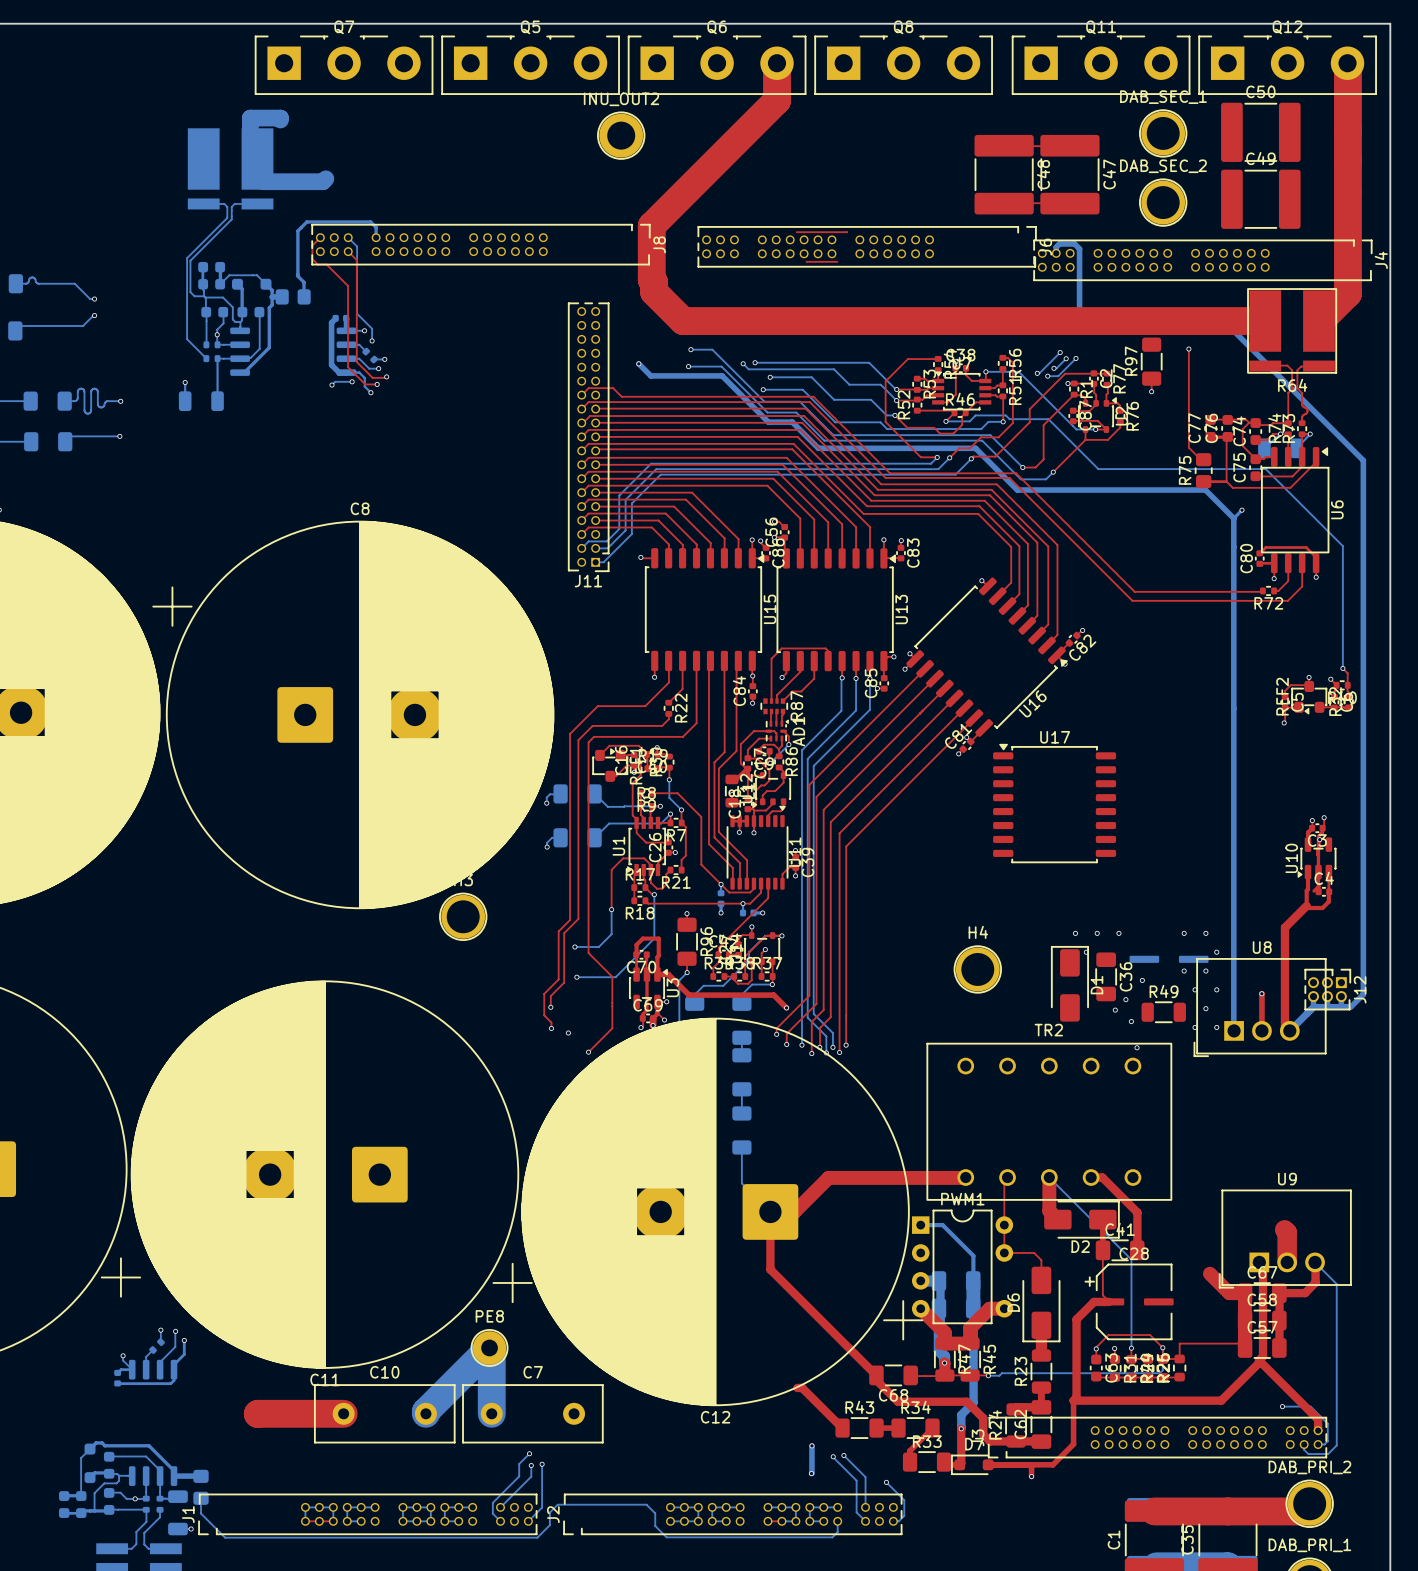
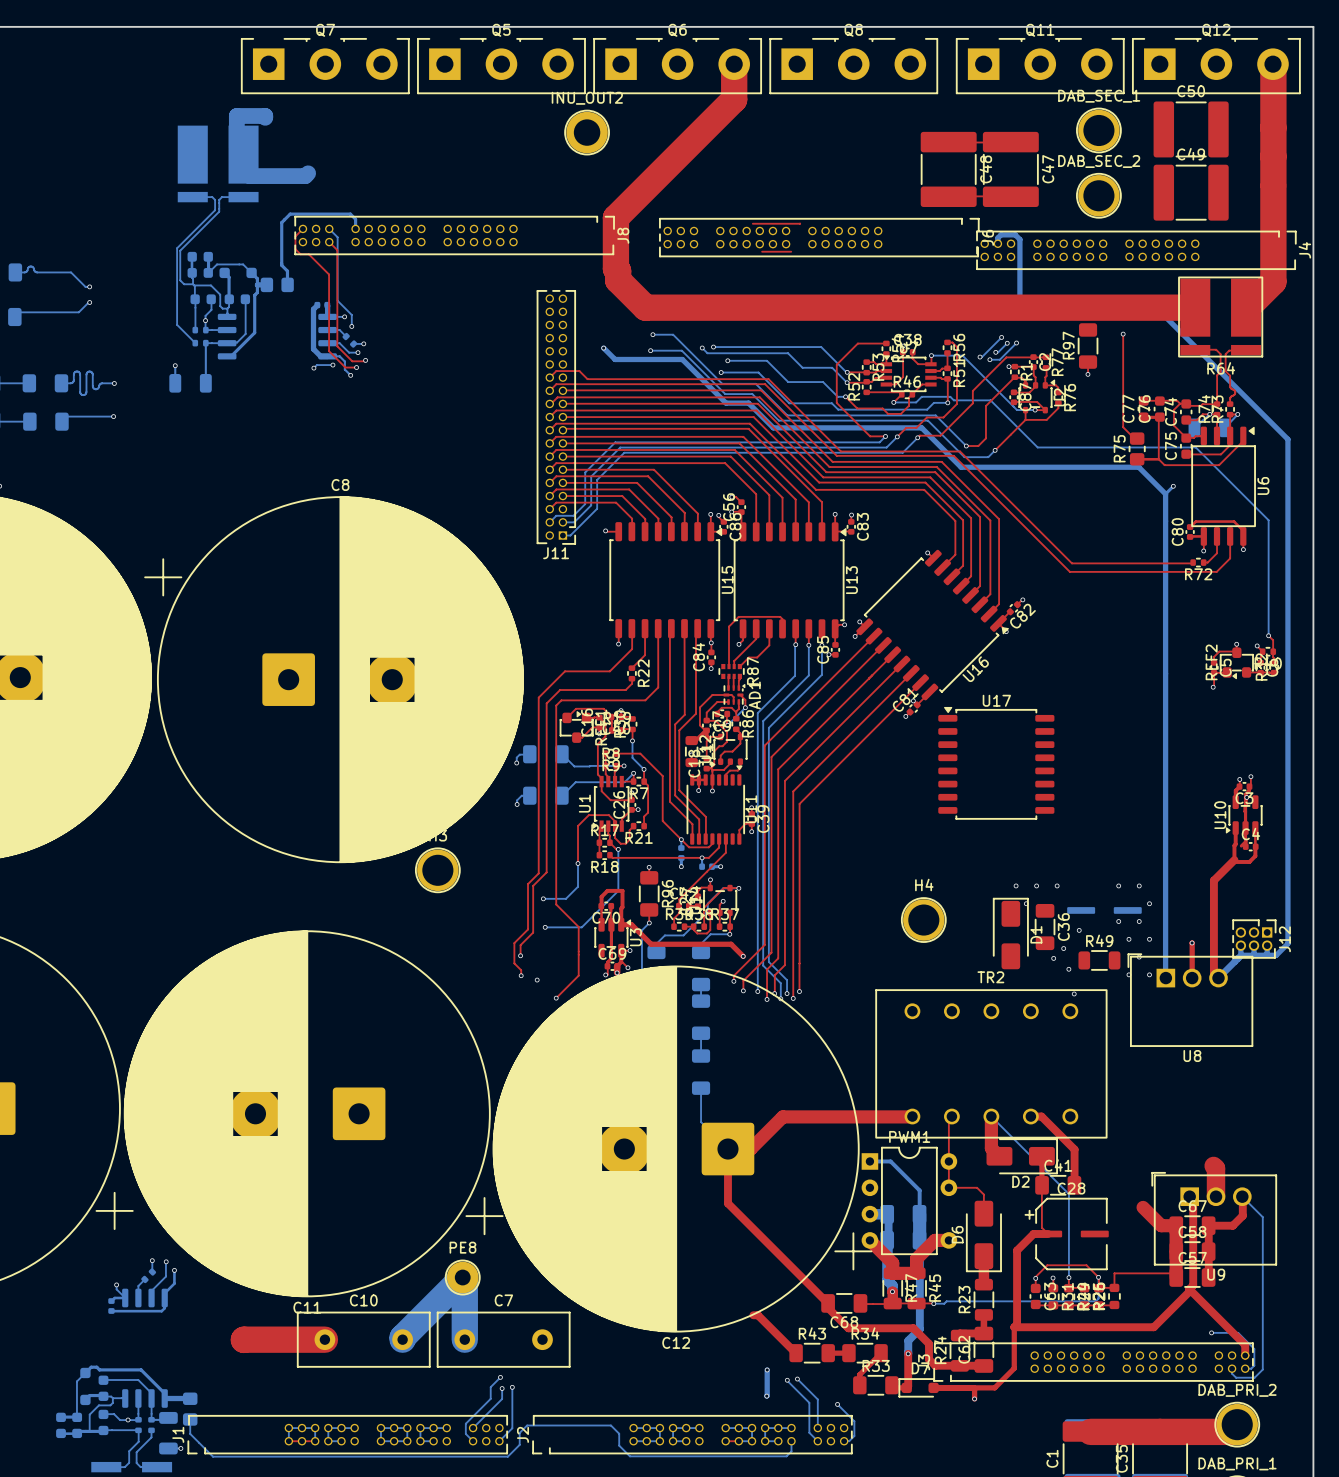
U8 name position: U8 (1262, 947) -> U8 (1192, 1056)
U8 footprint: [1193, 958, 1327, 1057] -> [1127, 953, 1254, 1047]
U9 name position: U9 (1287, 1179) -> U9 (1216, 1274)
U9 footprint: [1219, 1189, 1352, 1289] -> [1151, 1172, 1277, 1266]

